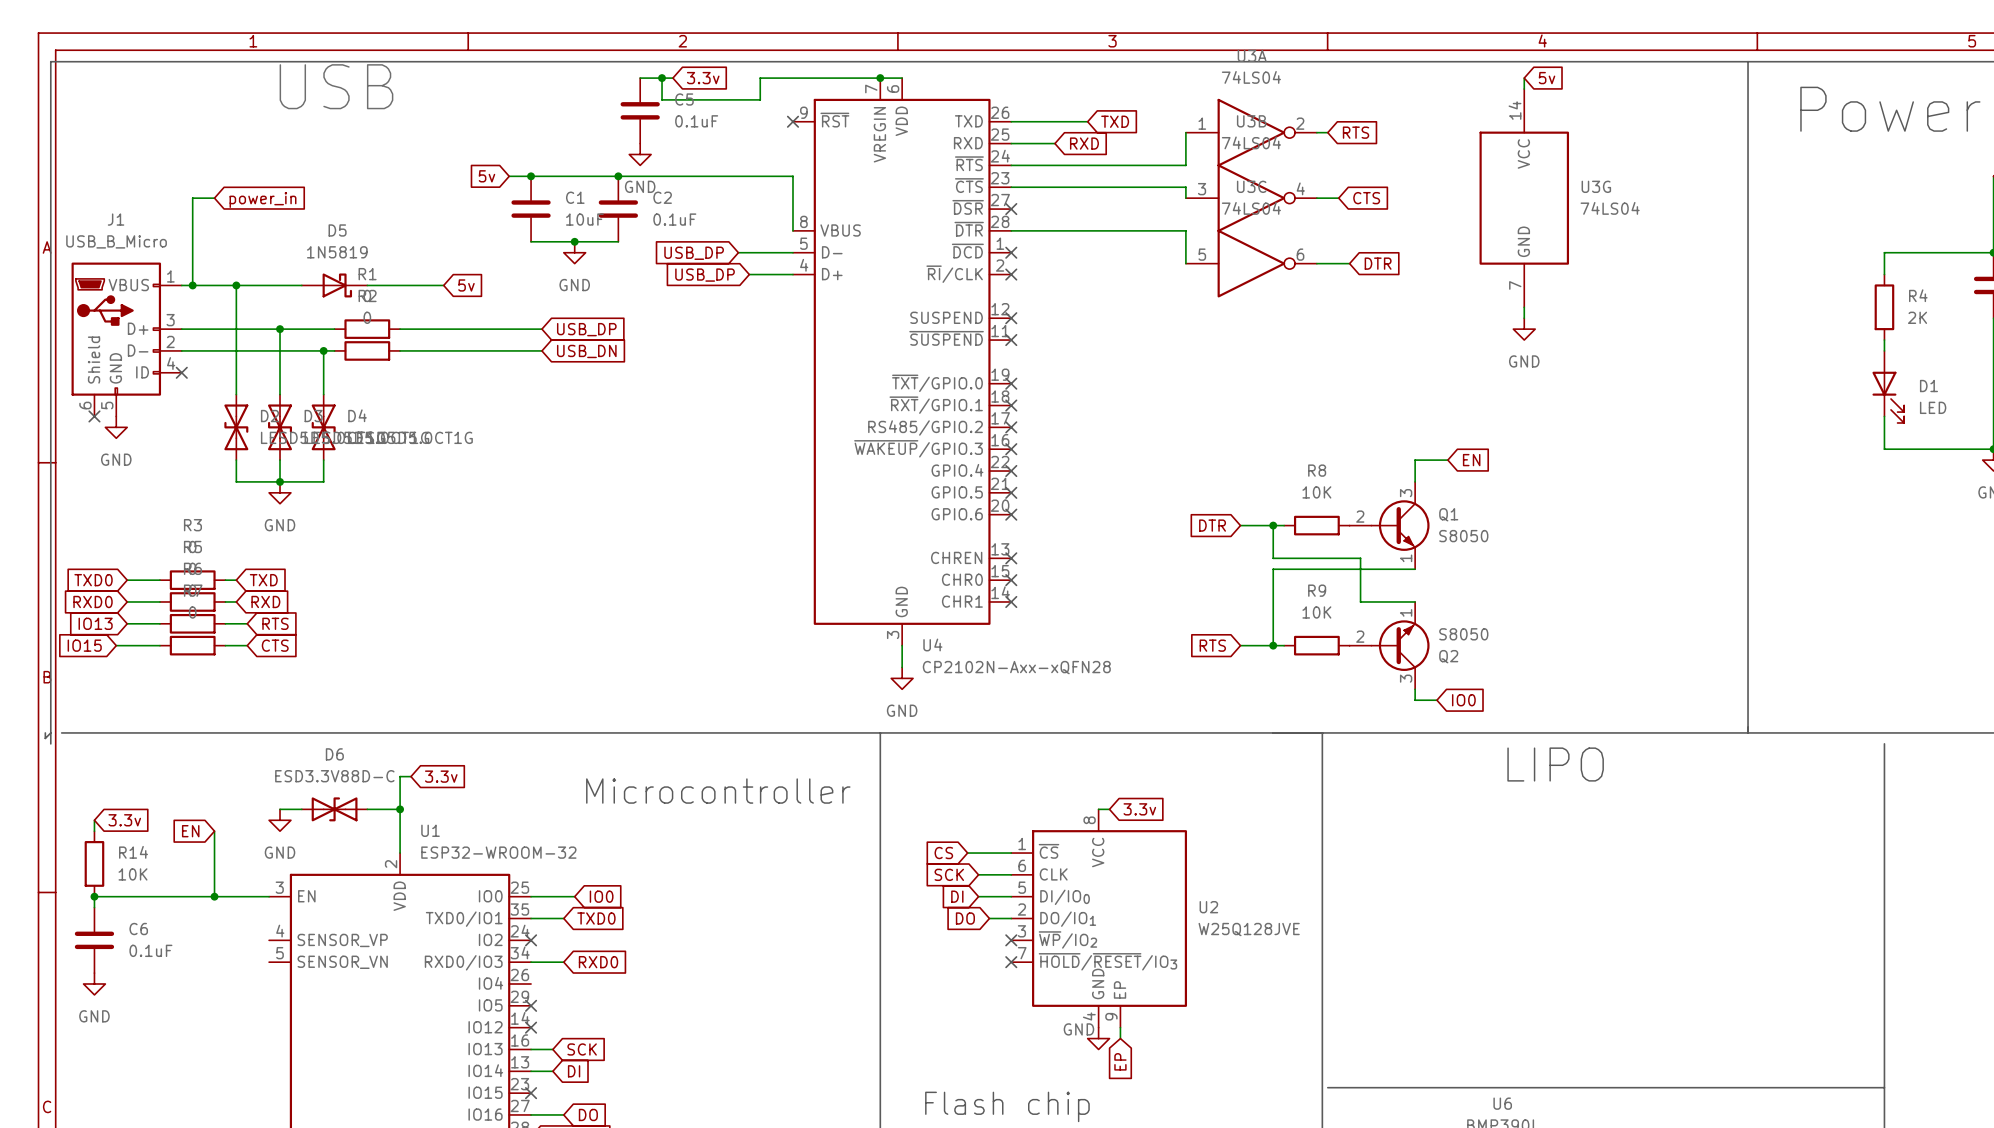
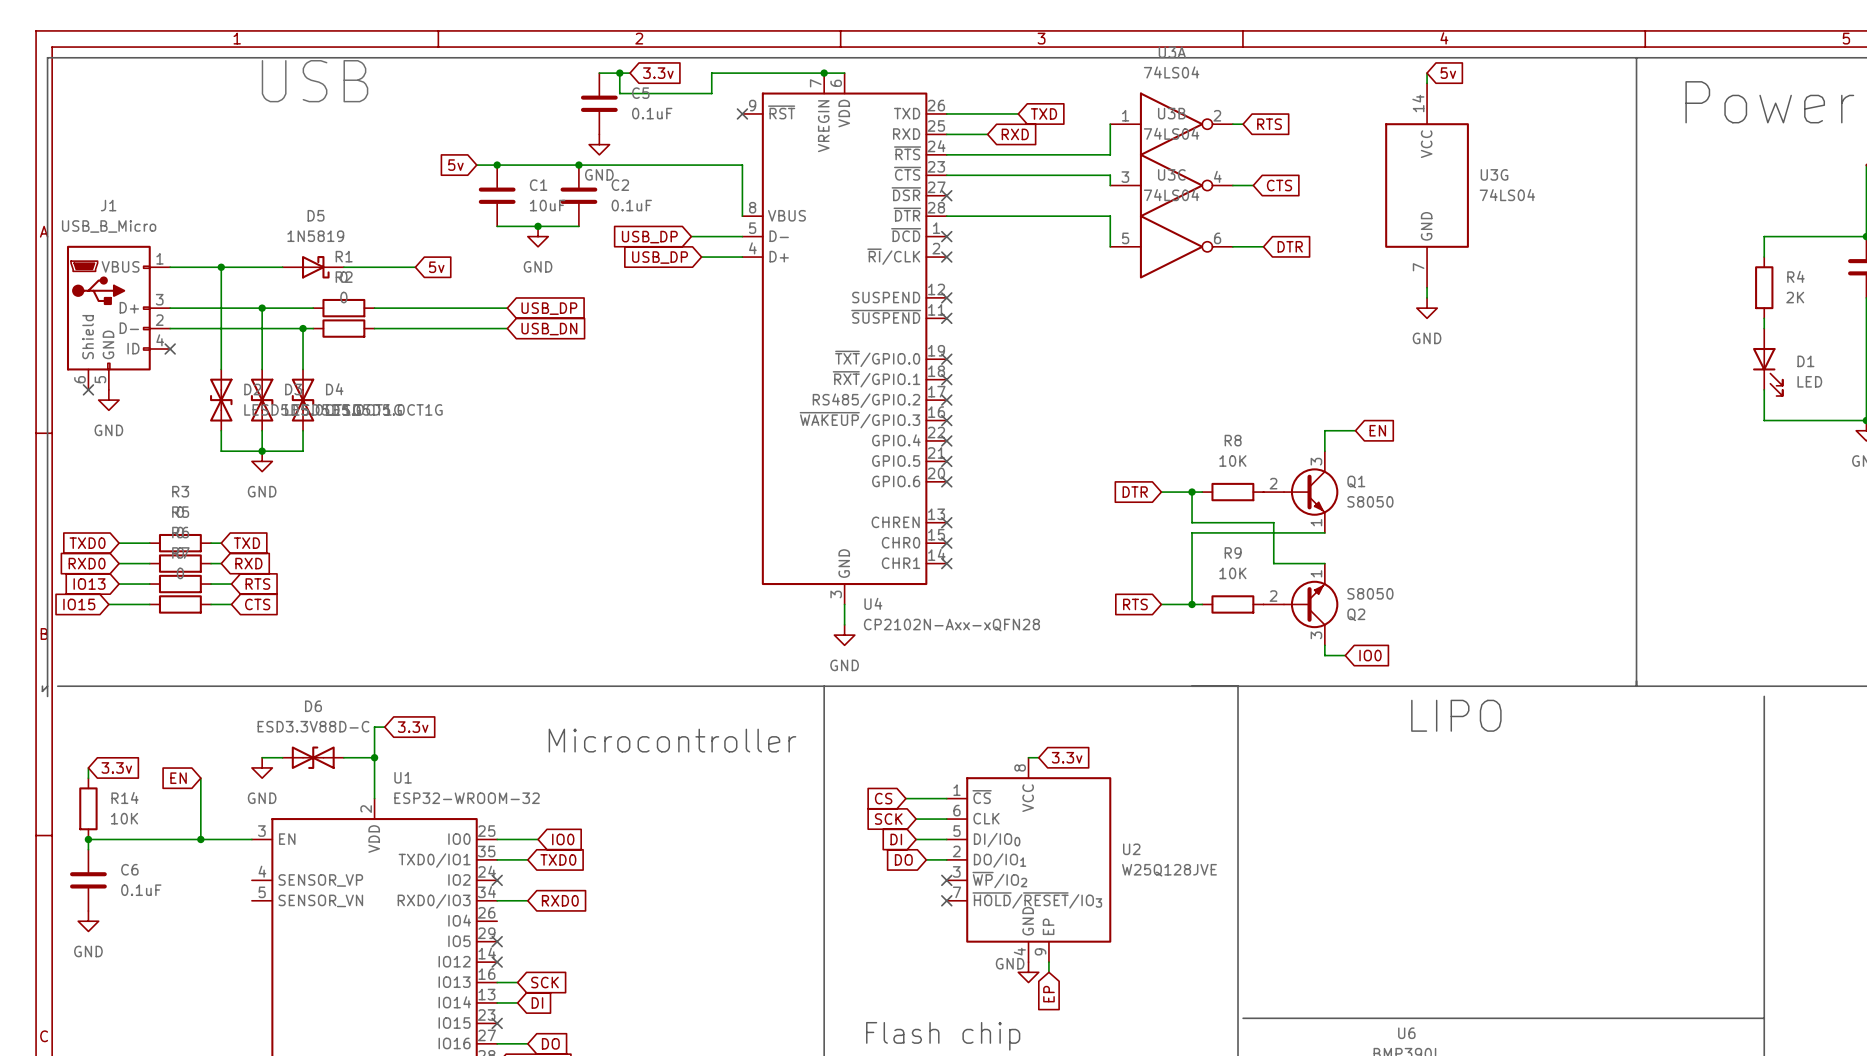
wire: (214, 198) (192, 198) (192, 285) -> none
global label: power_in (263, 199) -> none
junction: (192, 285) -> none

